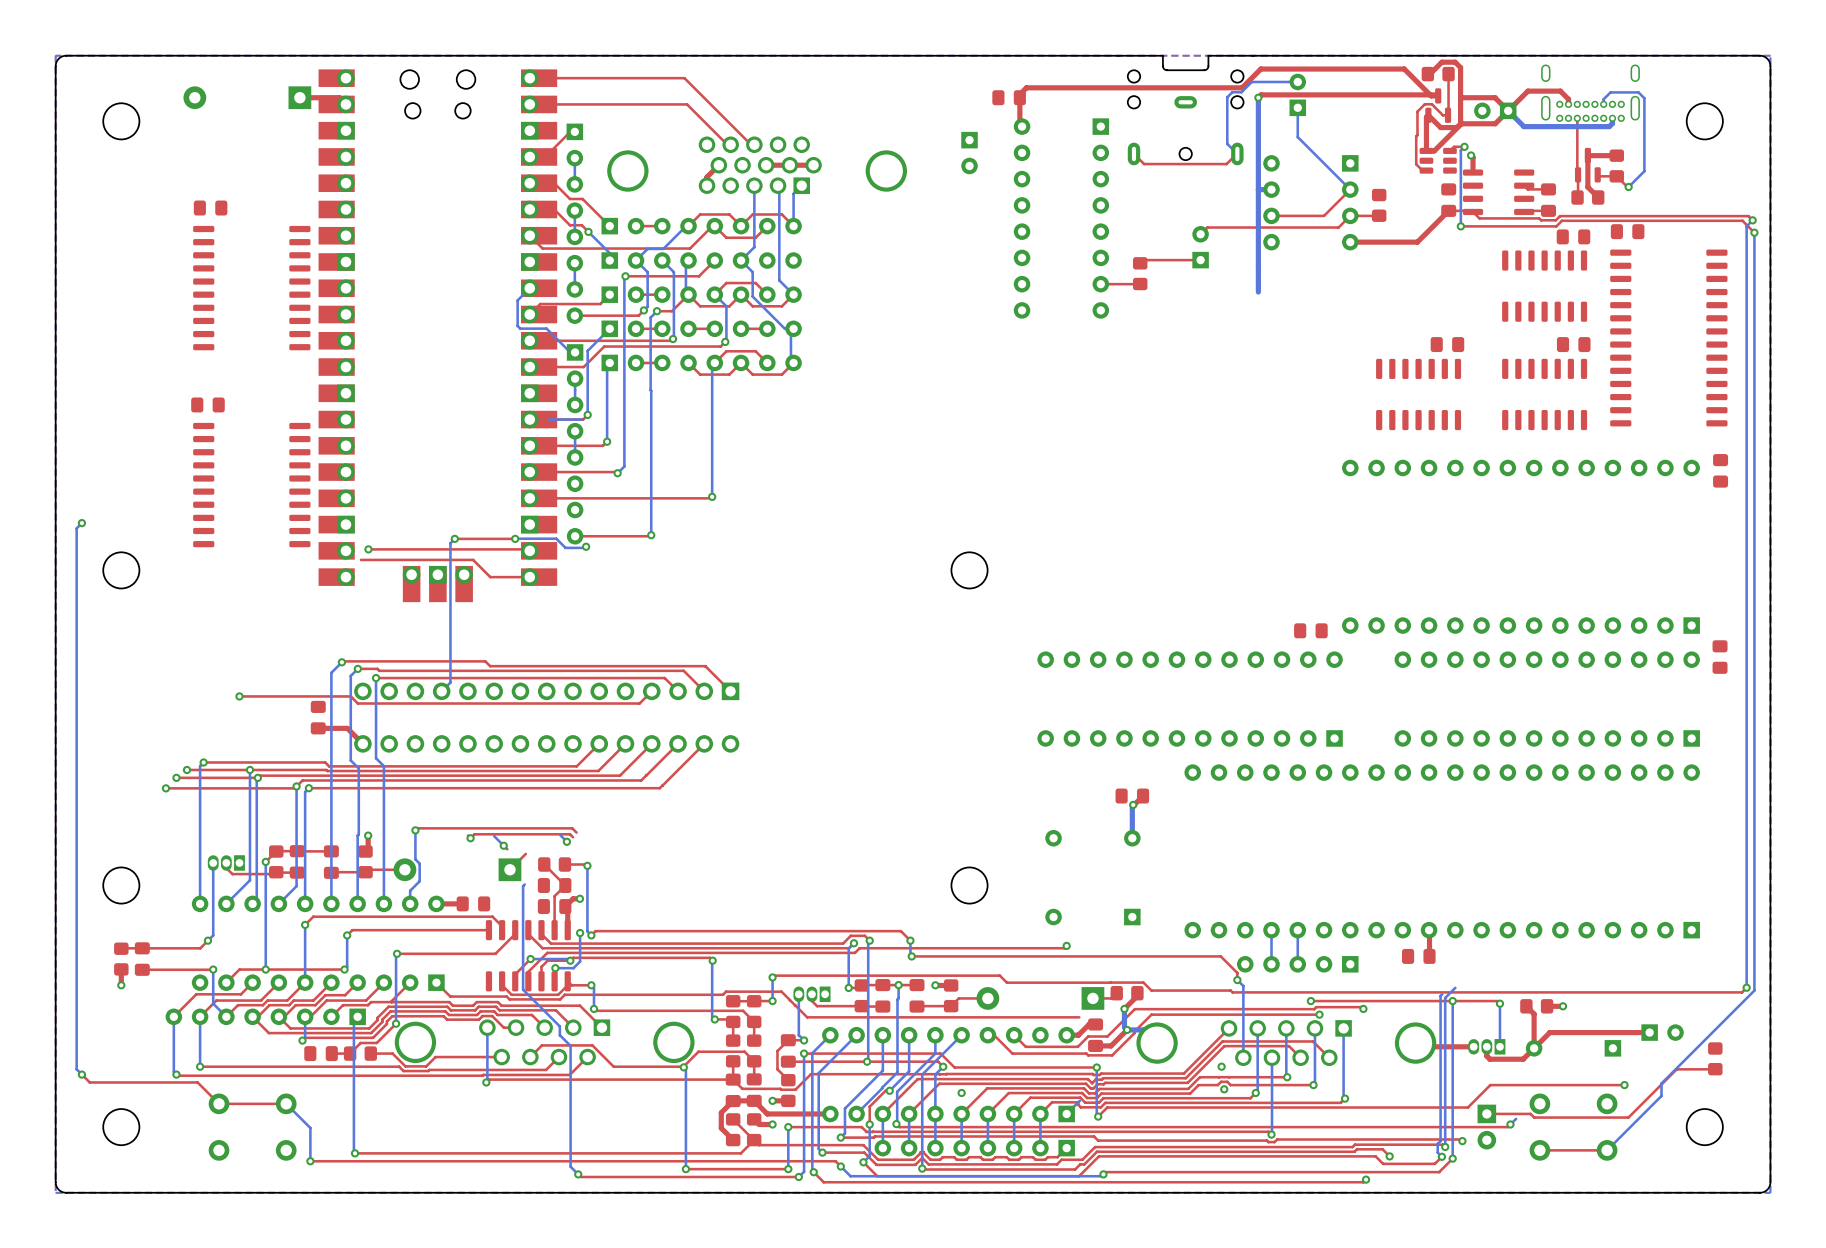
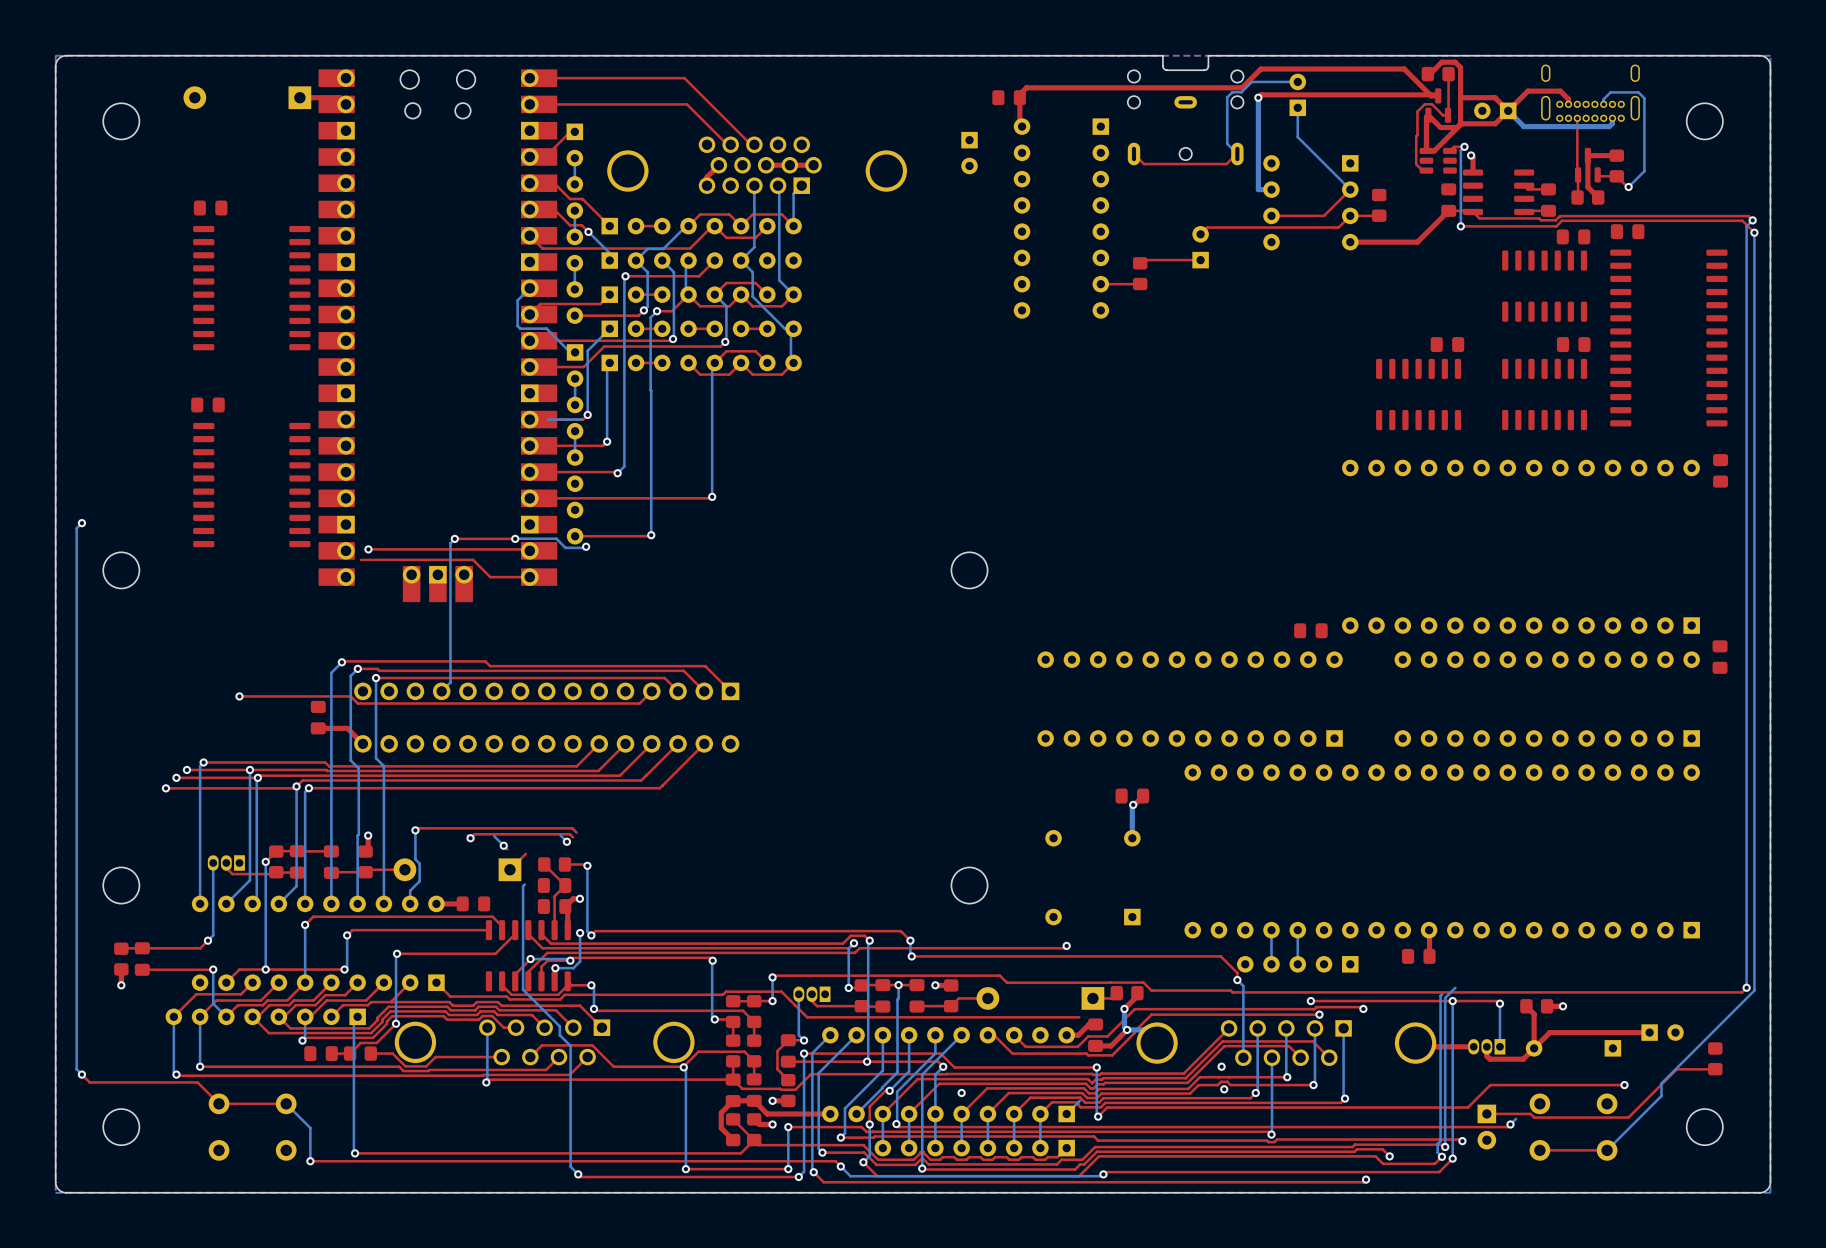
bottom track: (1258, 189) (1258, 292) -> none

